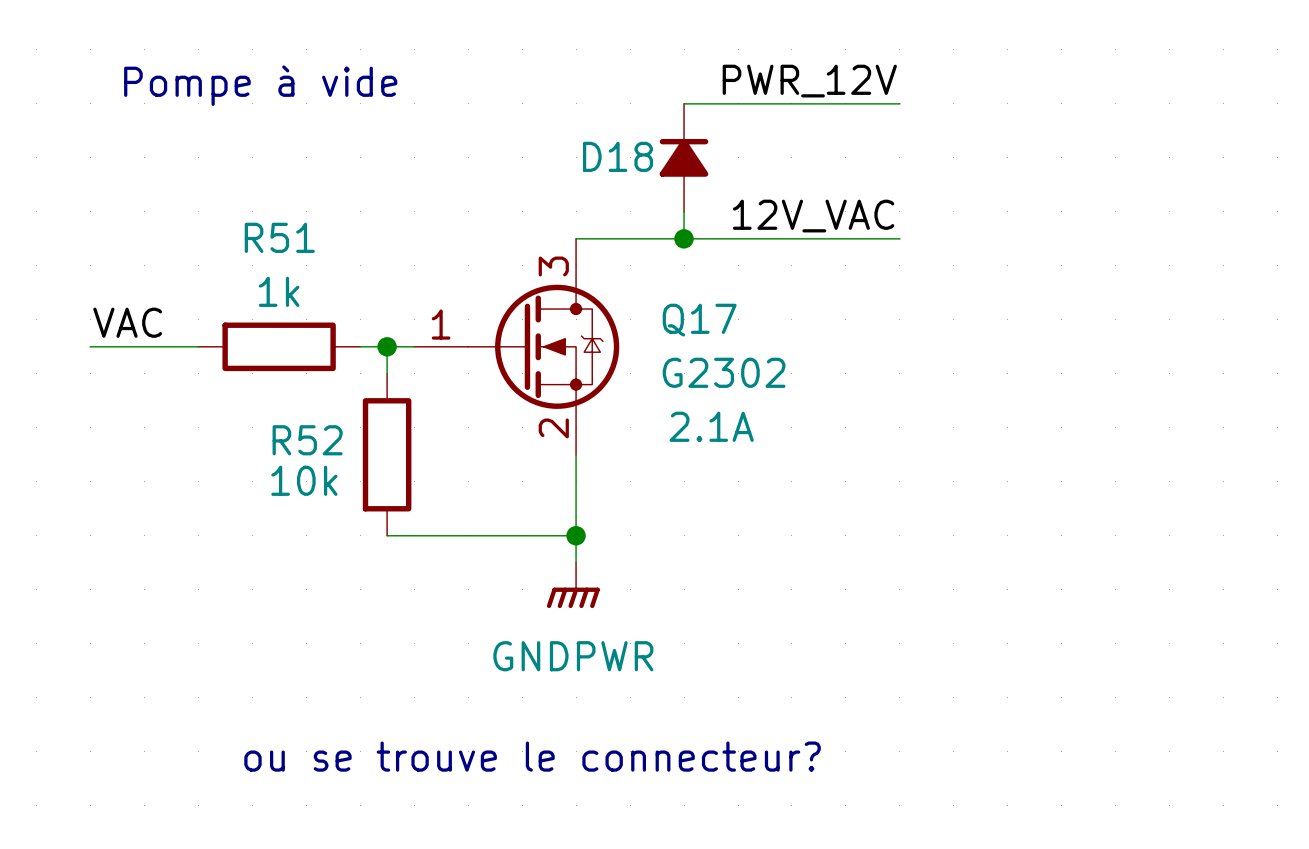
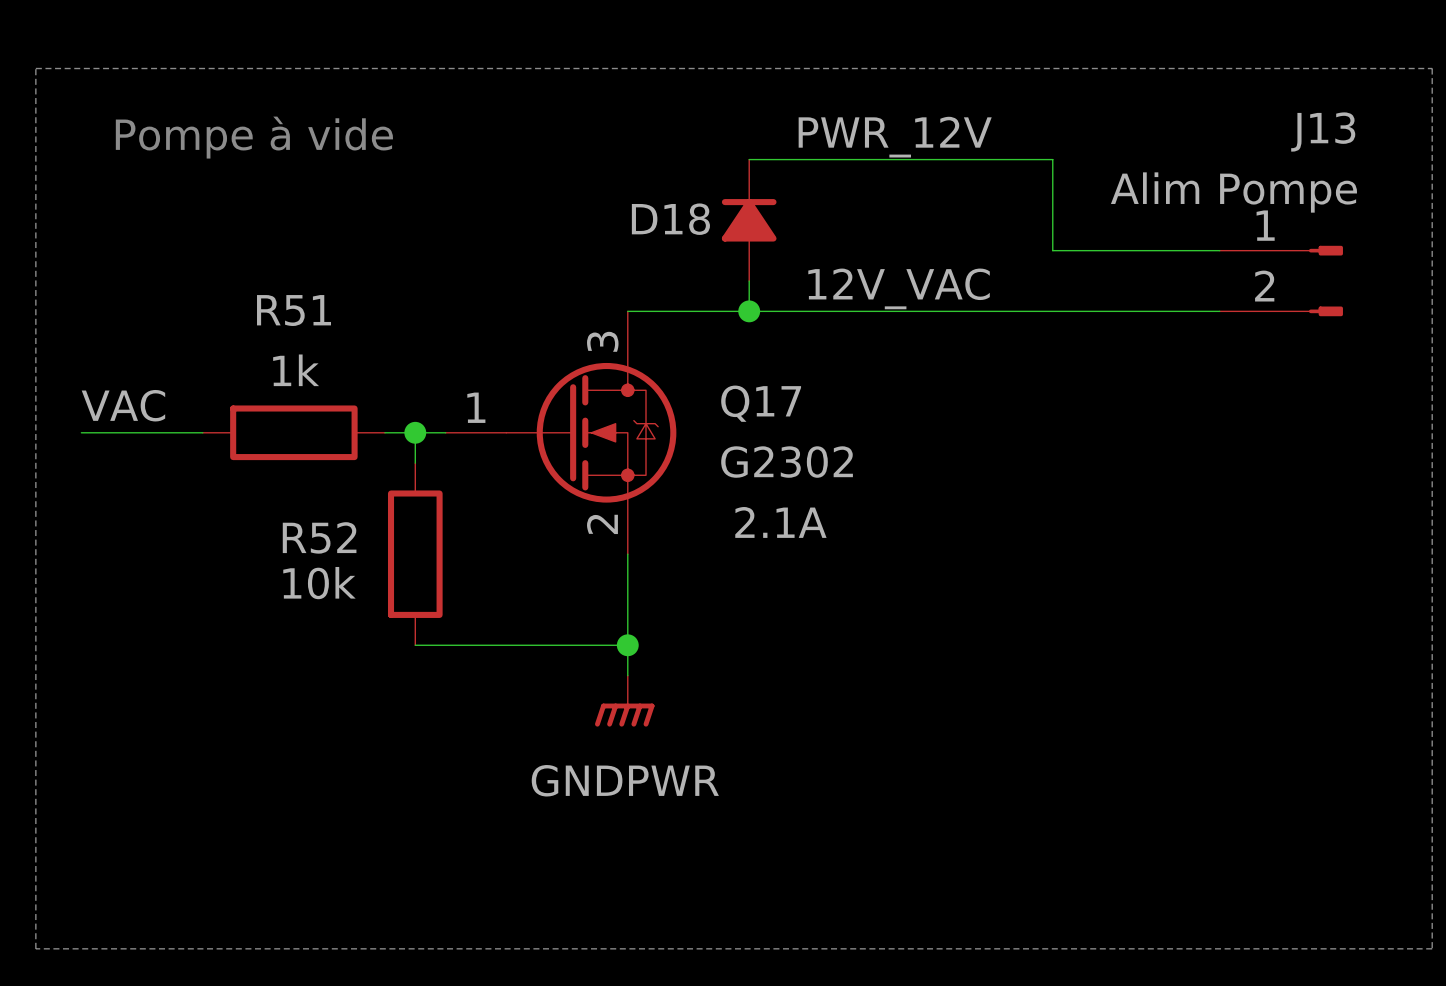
line: none -> (35, 68) (1432, 68) (1432, 948) (35, 948) (35, 68)
wire: none -> (992, 159) (1052, 159) (1052, 250) (1219, 250)
J13: none -> Alim Pompe (1281, 281)
wire: none -> (992, 311) (1219, 311)
text: ou se trouve le connecteur? (532, 756) -> none

